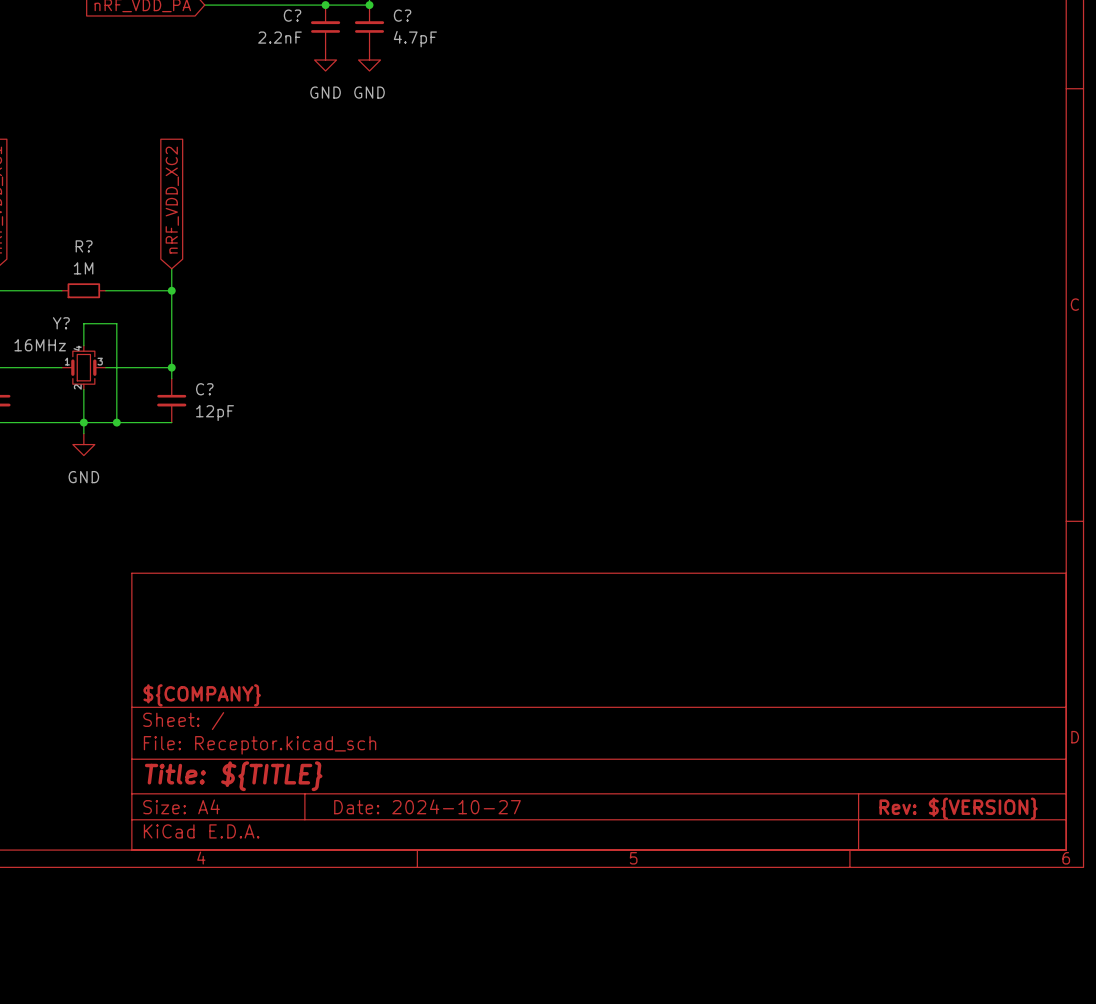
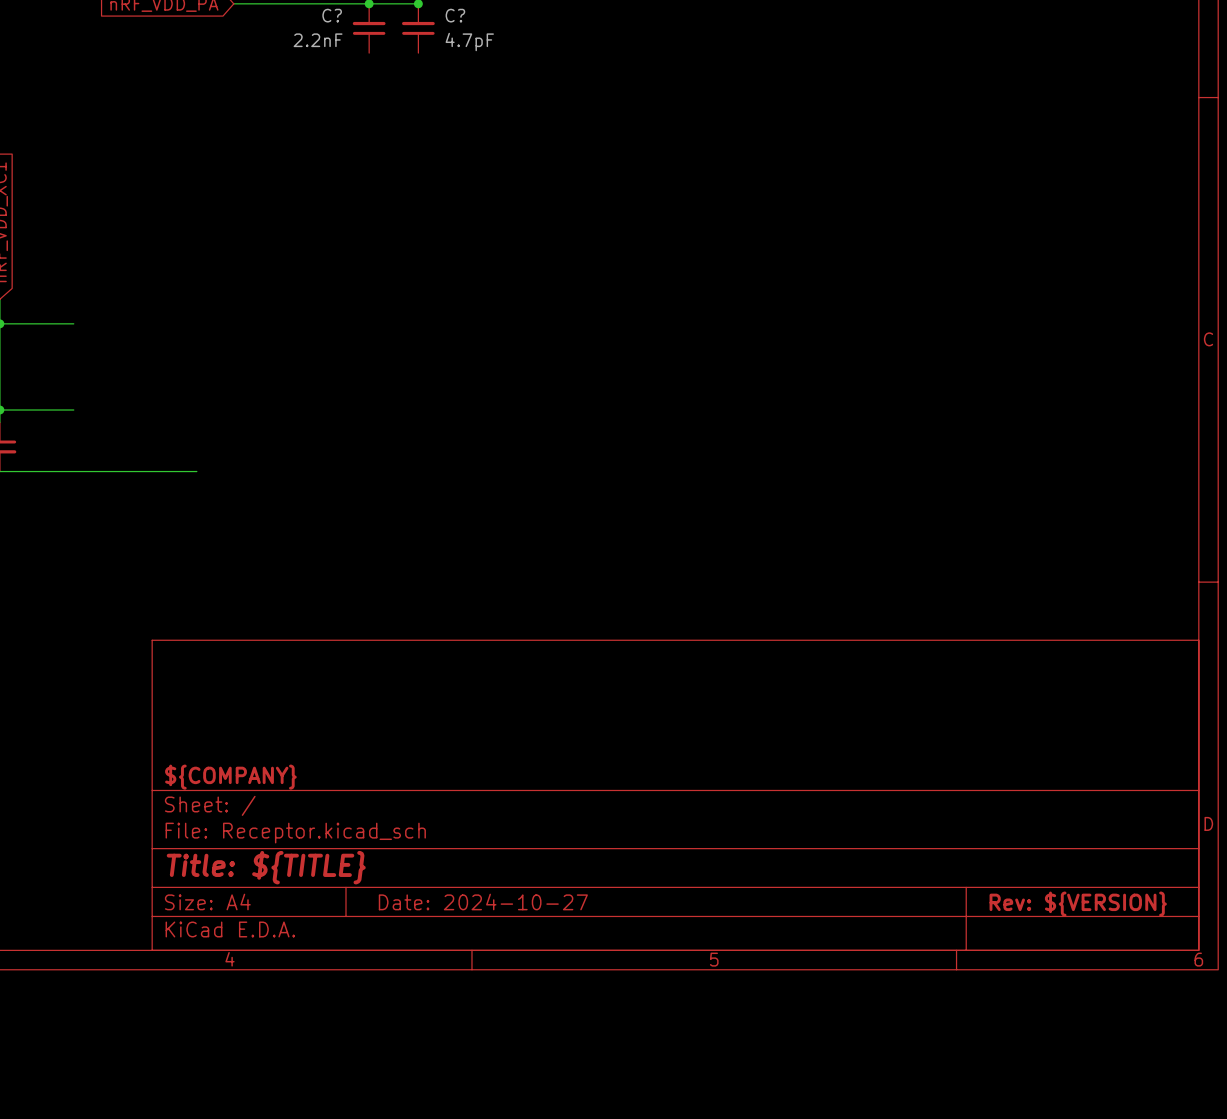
power symbol: GND (325, 60) -> none
power symbol: GND (369, 60) -> none
global label: nRF_VDD_XC2 (172, 200) -> none
wire: (171, 268) (171, 378) -> none
R?: 1M (83, 290) -> none
wire: (105, 290) (171, 290) -> none
junction: (171, 290) -> none
wire: (83, 345) (83, 323) (116, 323) (116, 422) -> none
Y?: 16MHz (83, 367) -> none
wire: (105, 367) (171, 367) -> none
junction: (171, 367) -> none
wire: (83, 389) (83, 433) -> none
C?: 12pF (171, 400) -> none
junction: (83, 422) -> none
junction: (116, 422) -> none
power symbol: GND (83, 444) -> none

